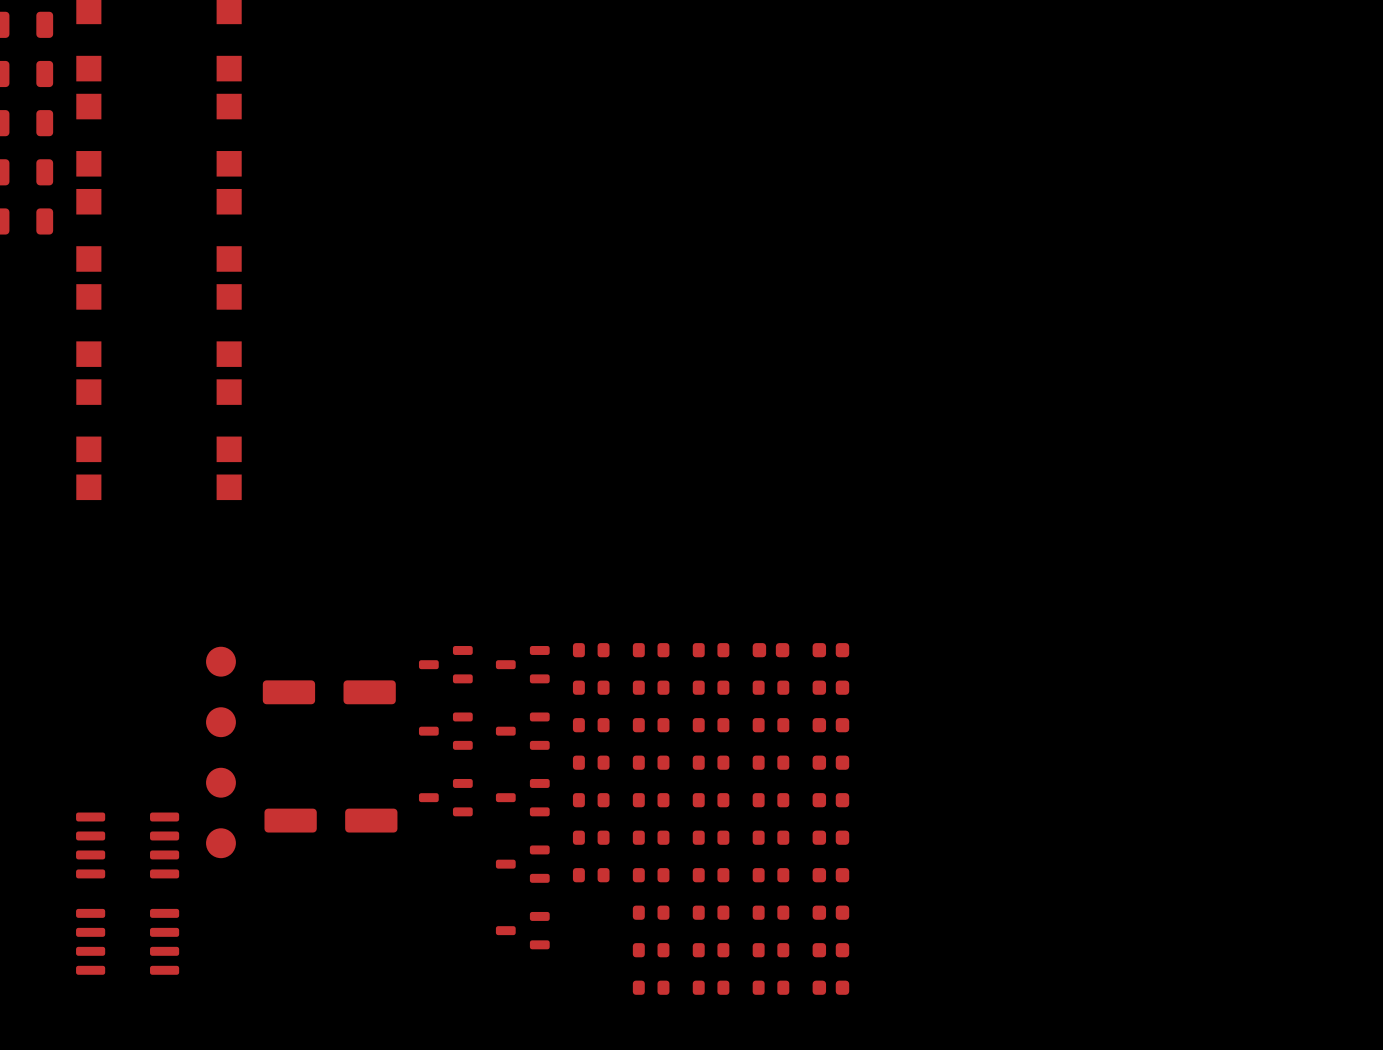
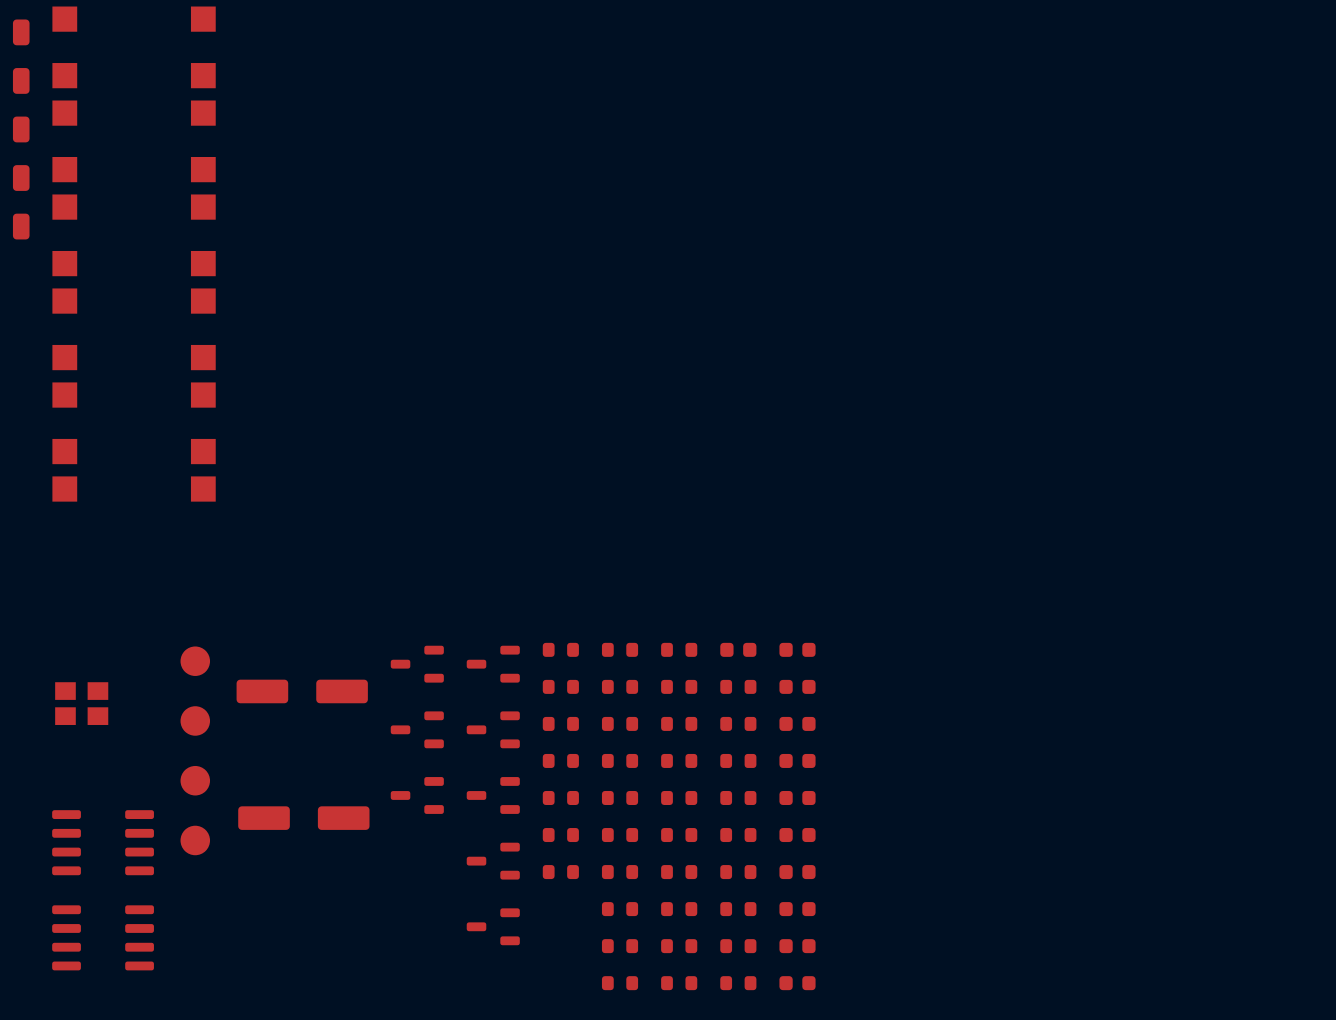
part: none -> (81, 703)

